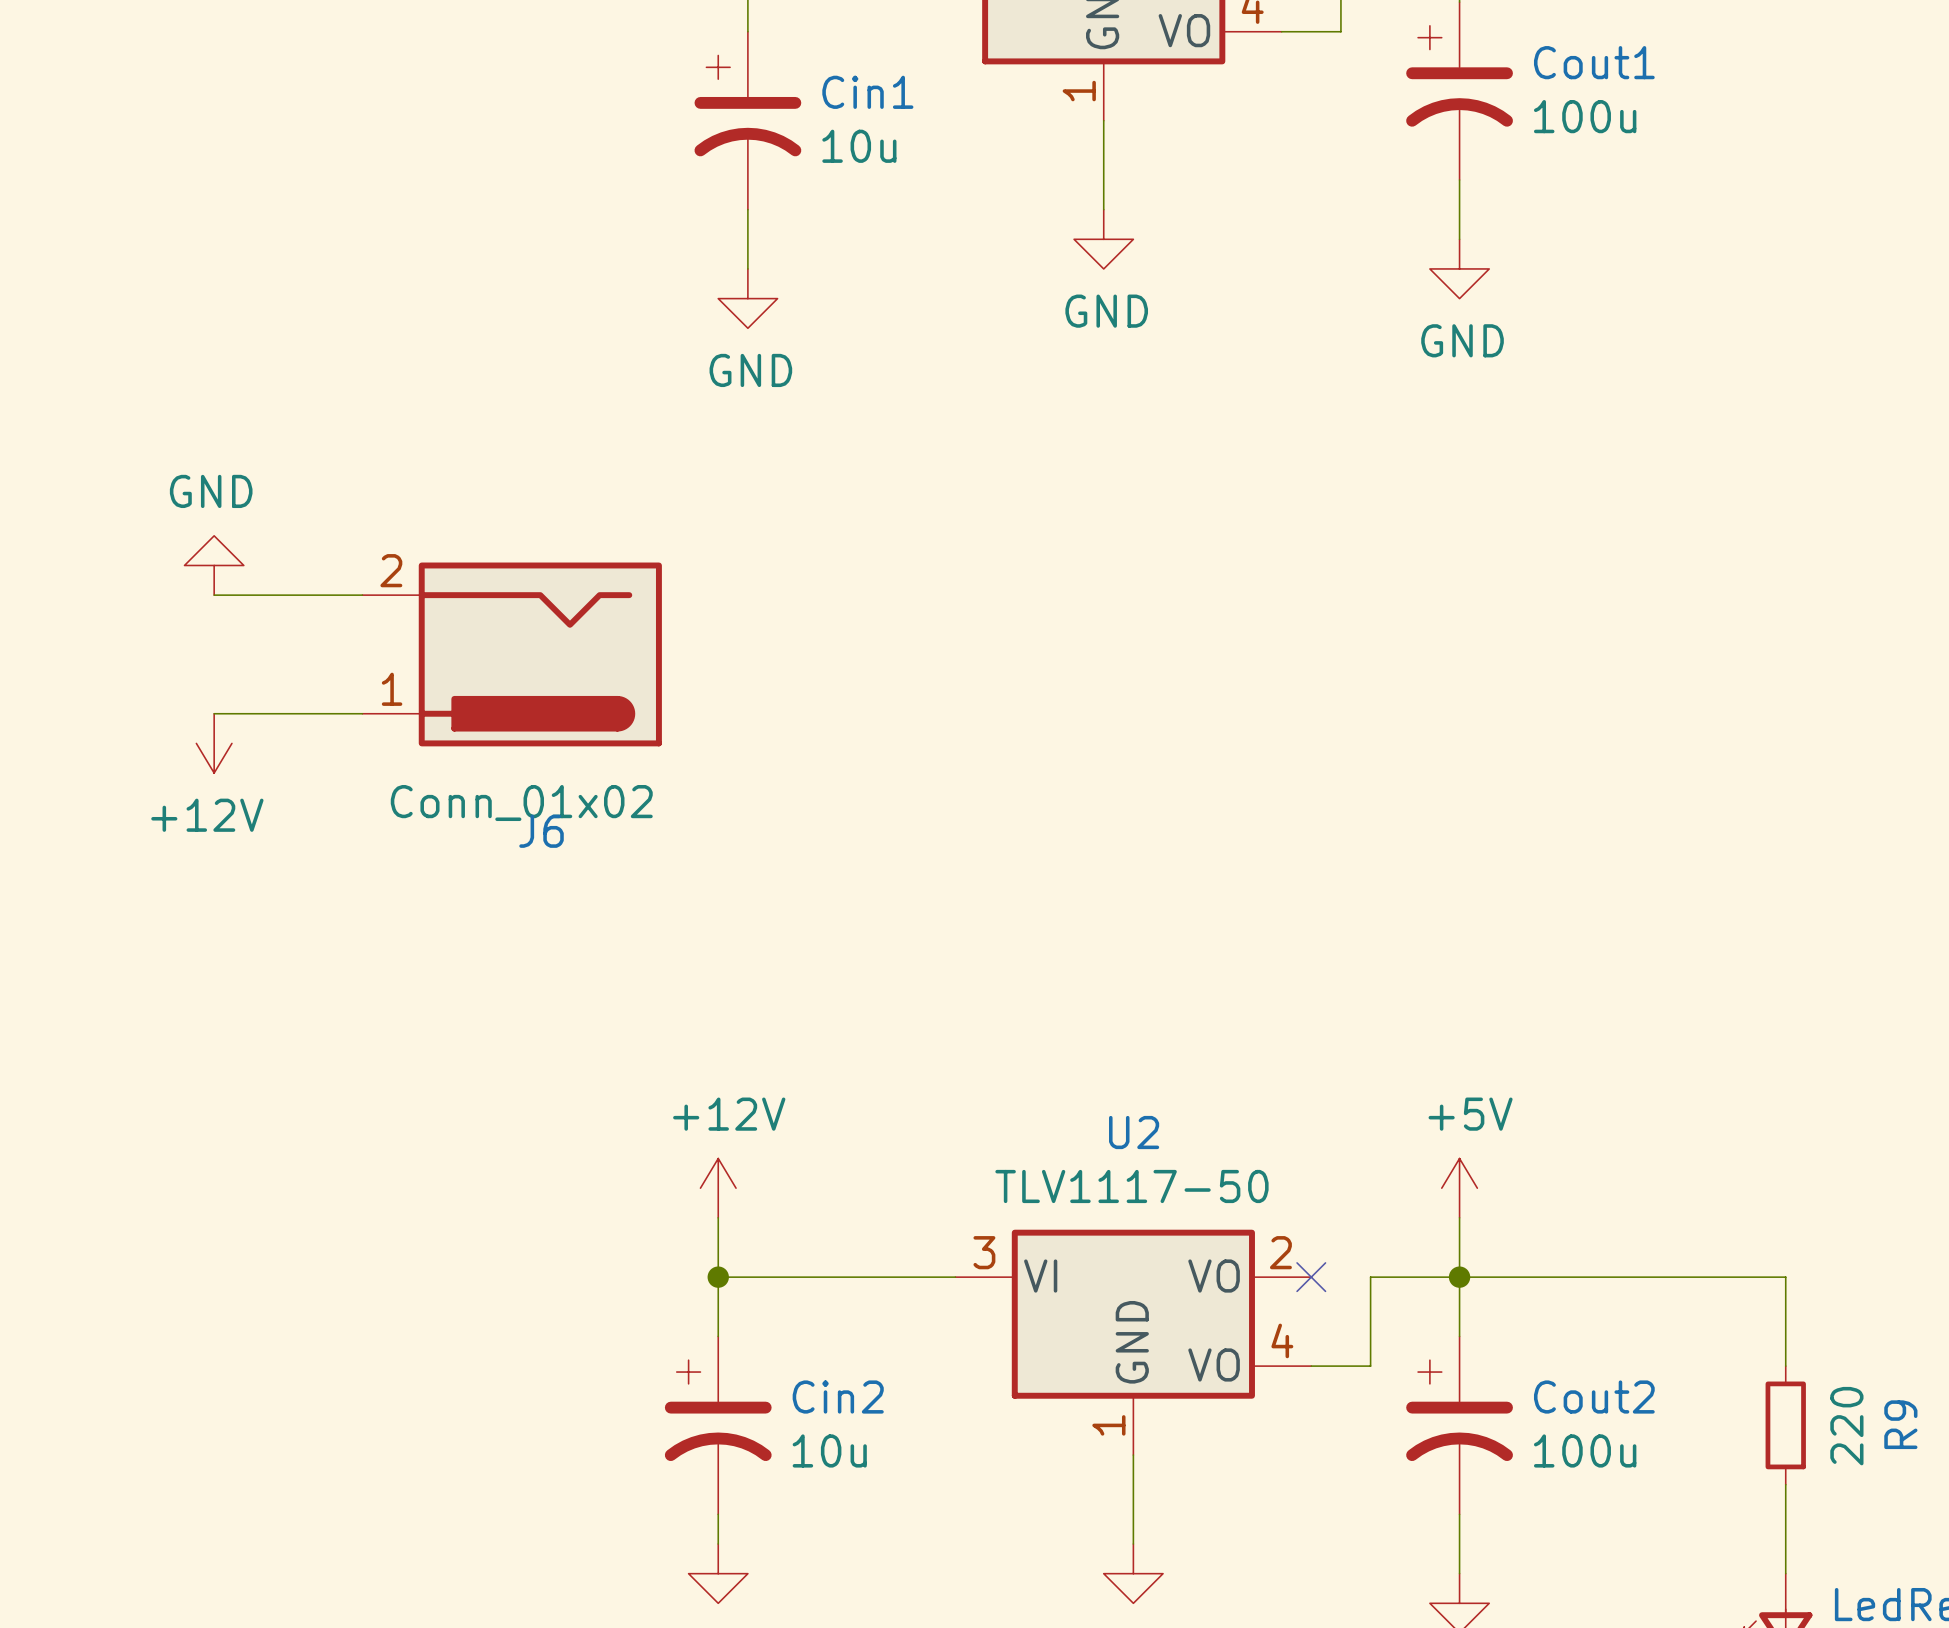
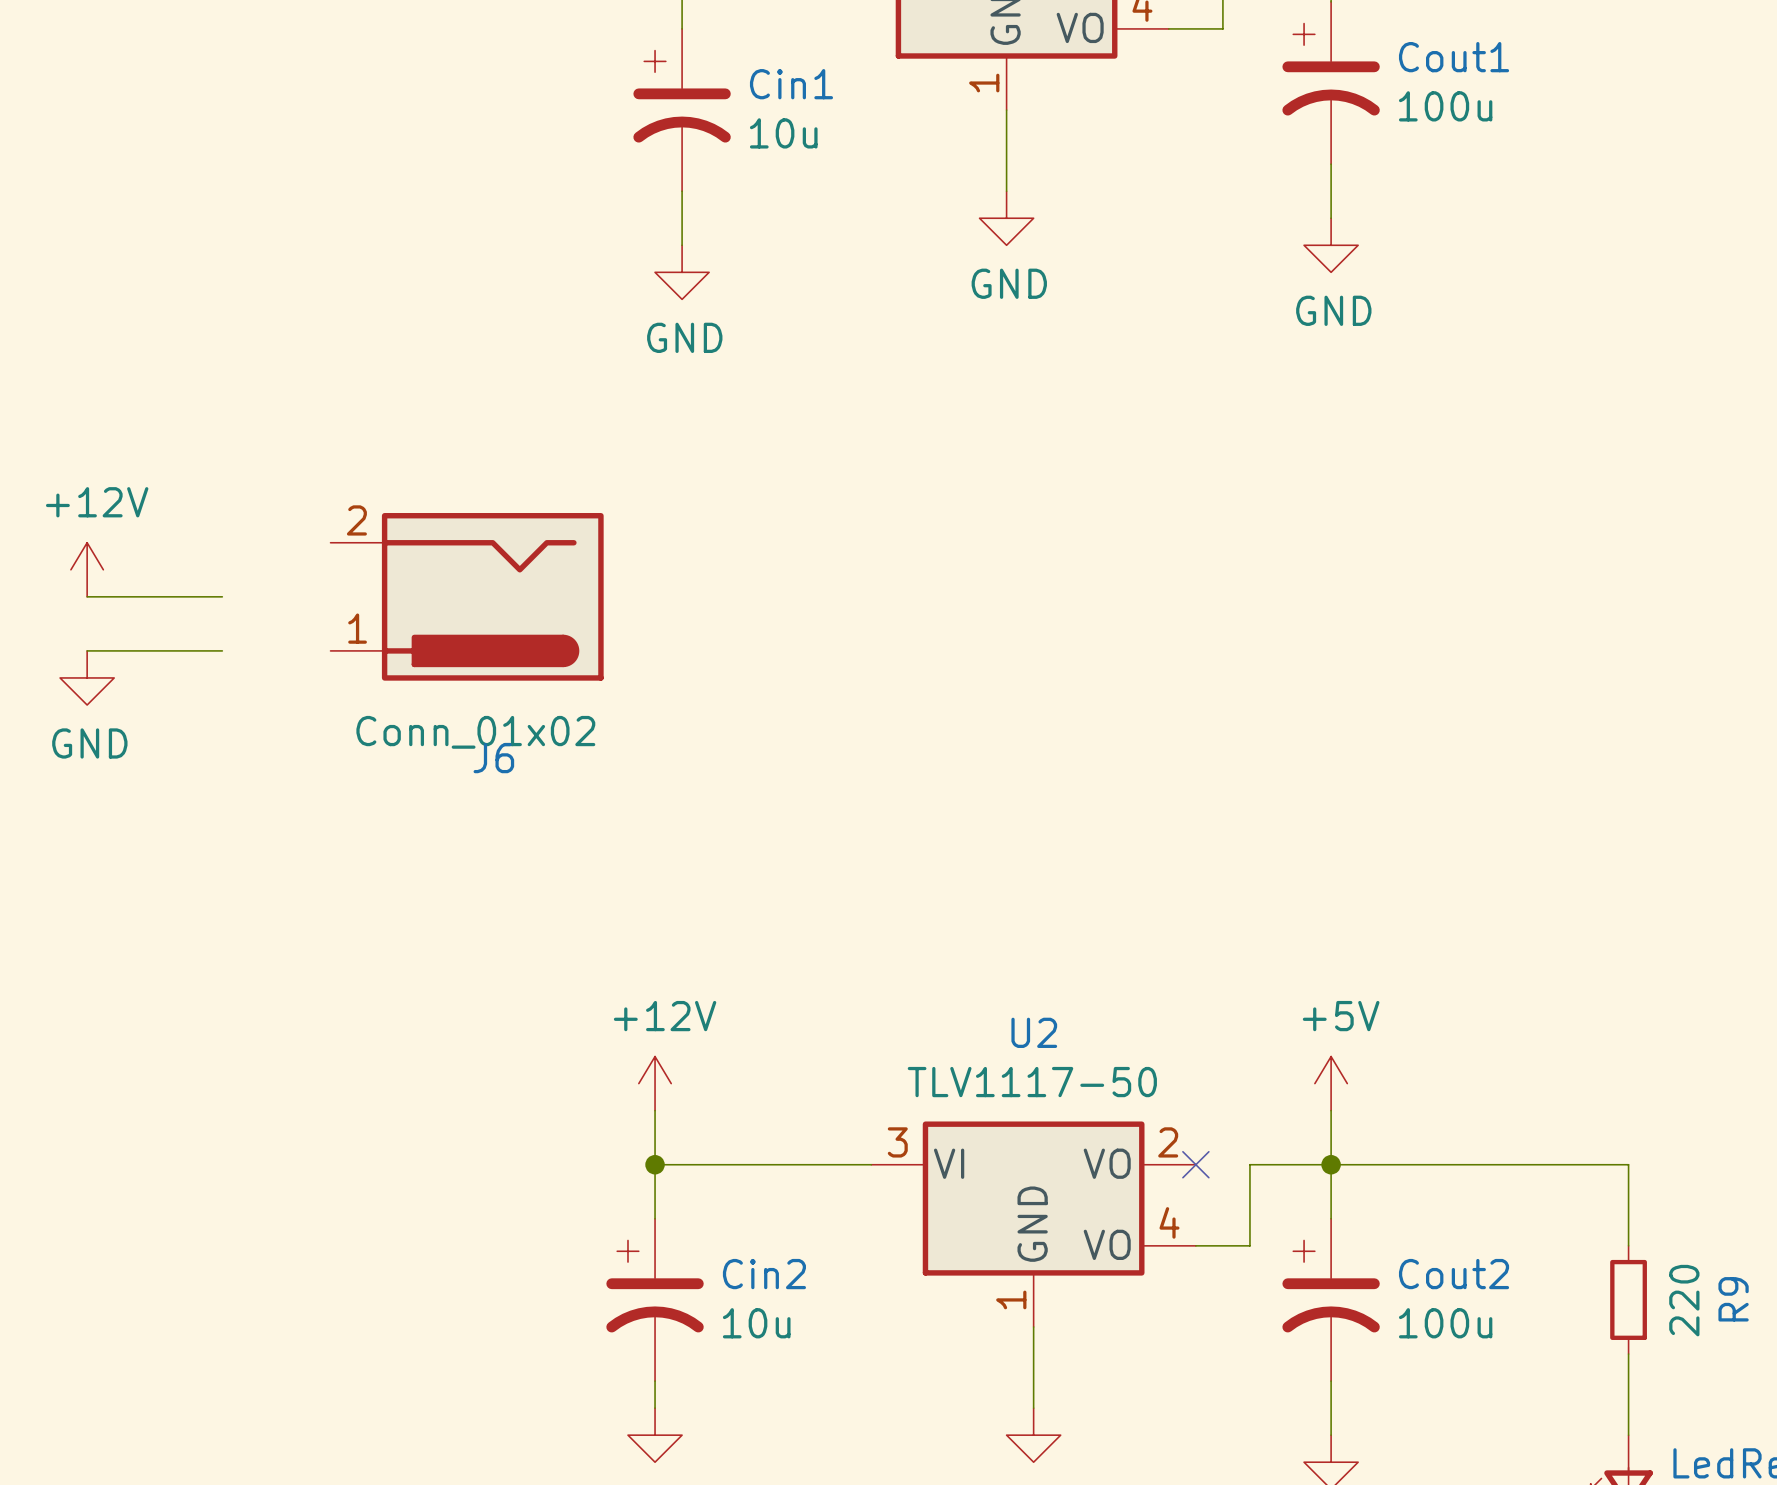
power symbol rotation: 0° (214, 565) -> 180° (87, 677)
power symbol position: GND (214, 565) -> GND (87, 677)
wire: (214, 595) (362, 595) -> (87, 596) (222, 596)
wire: (243, 713) (362, 713) -> (87, 650) (195, 650)
power symbol rotation: 0° (214, 743) -> 180° (87, 569)
power symbol position: +12V (214, 743) -> +12V (87, 569)

